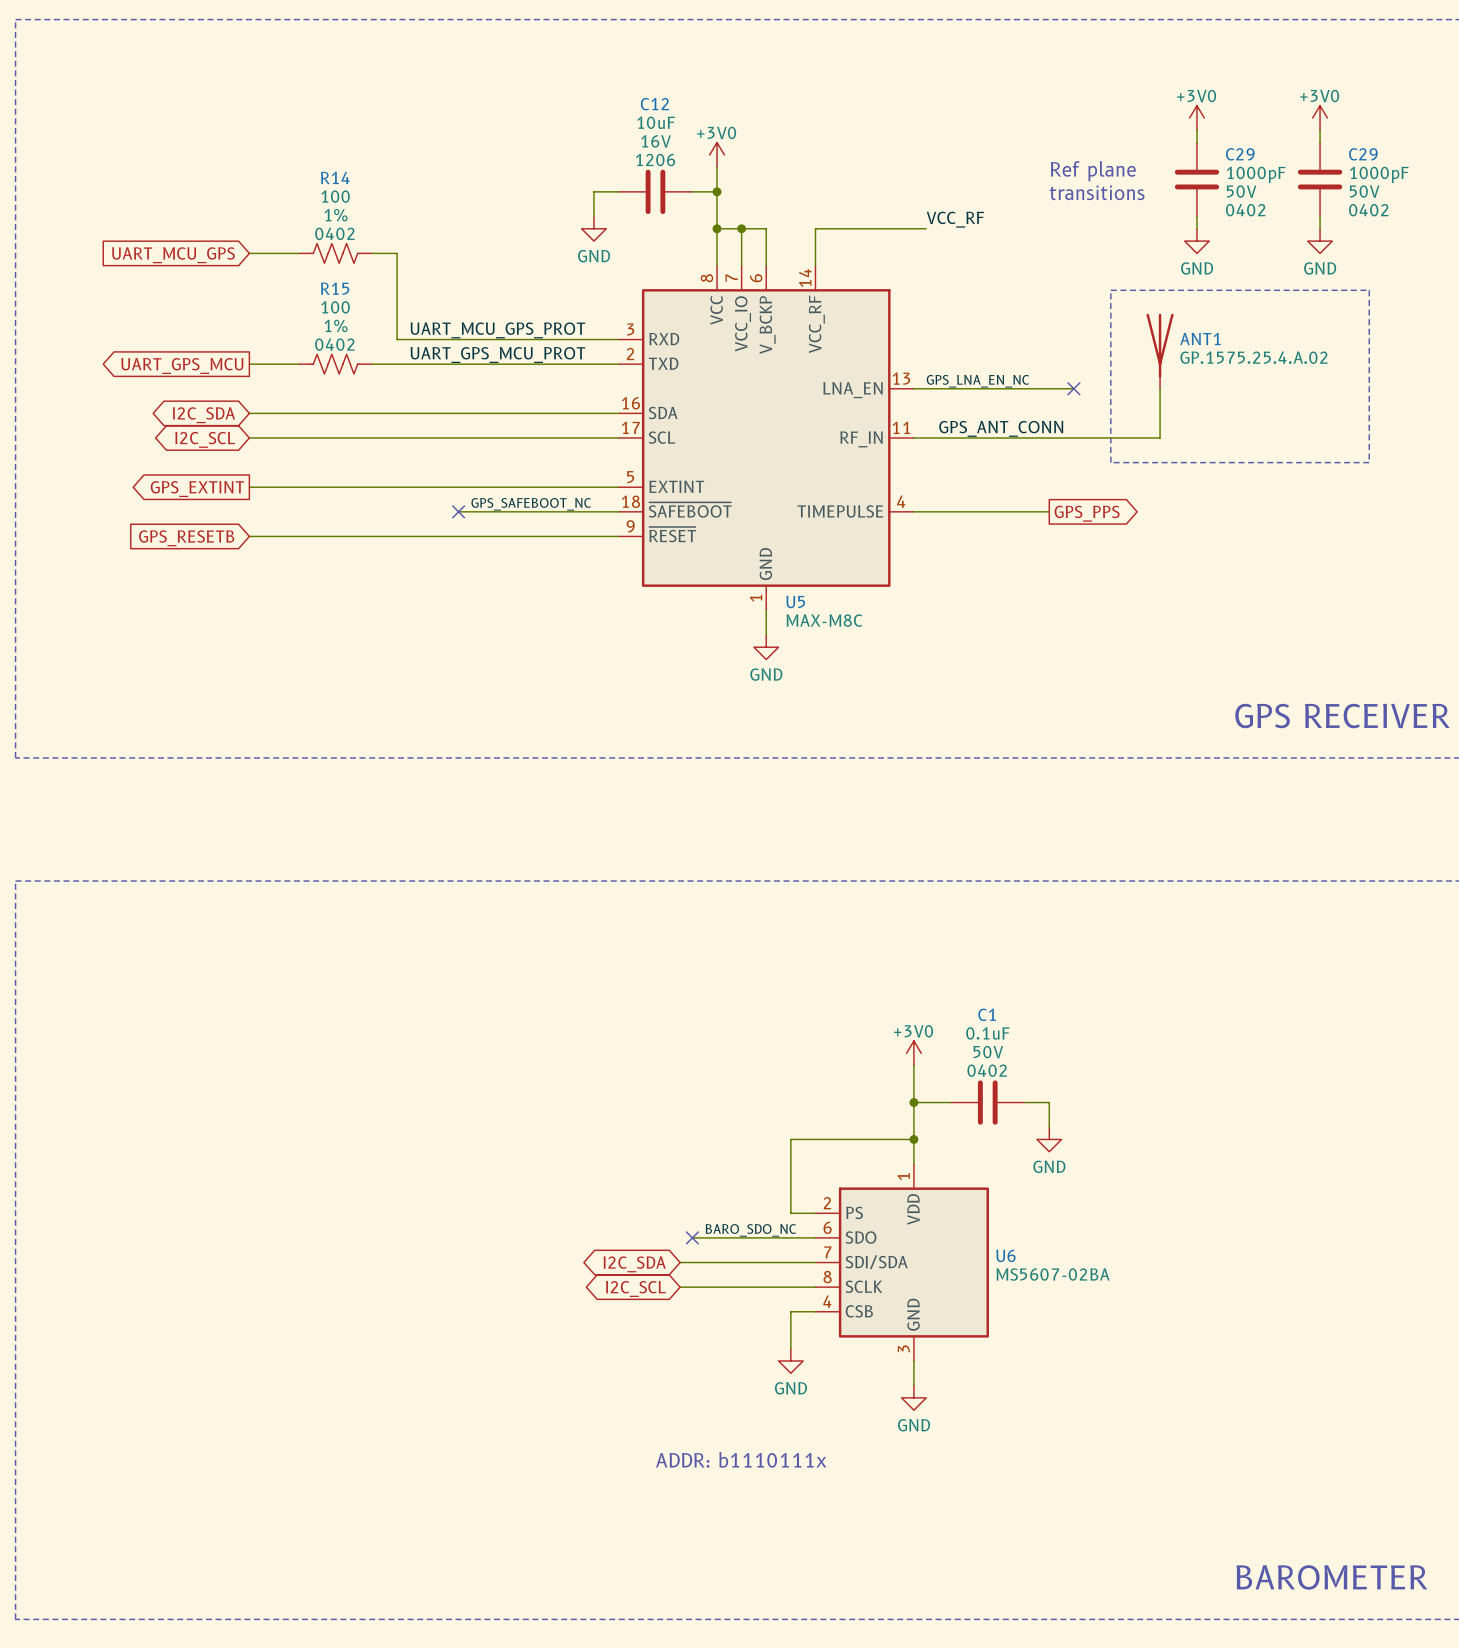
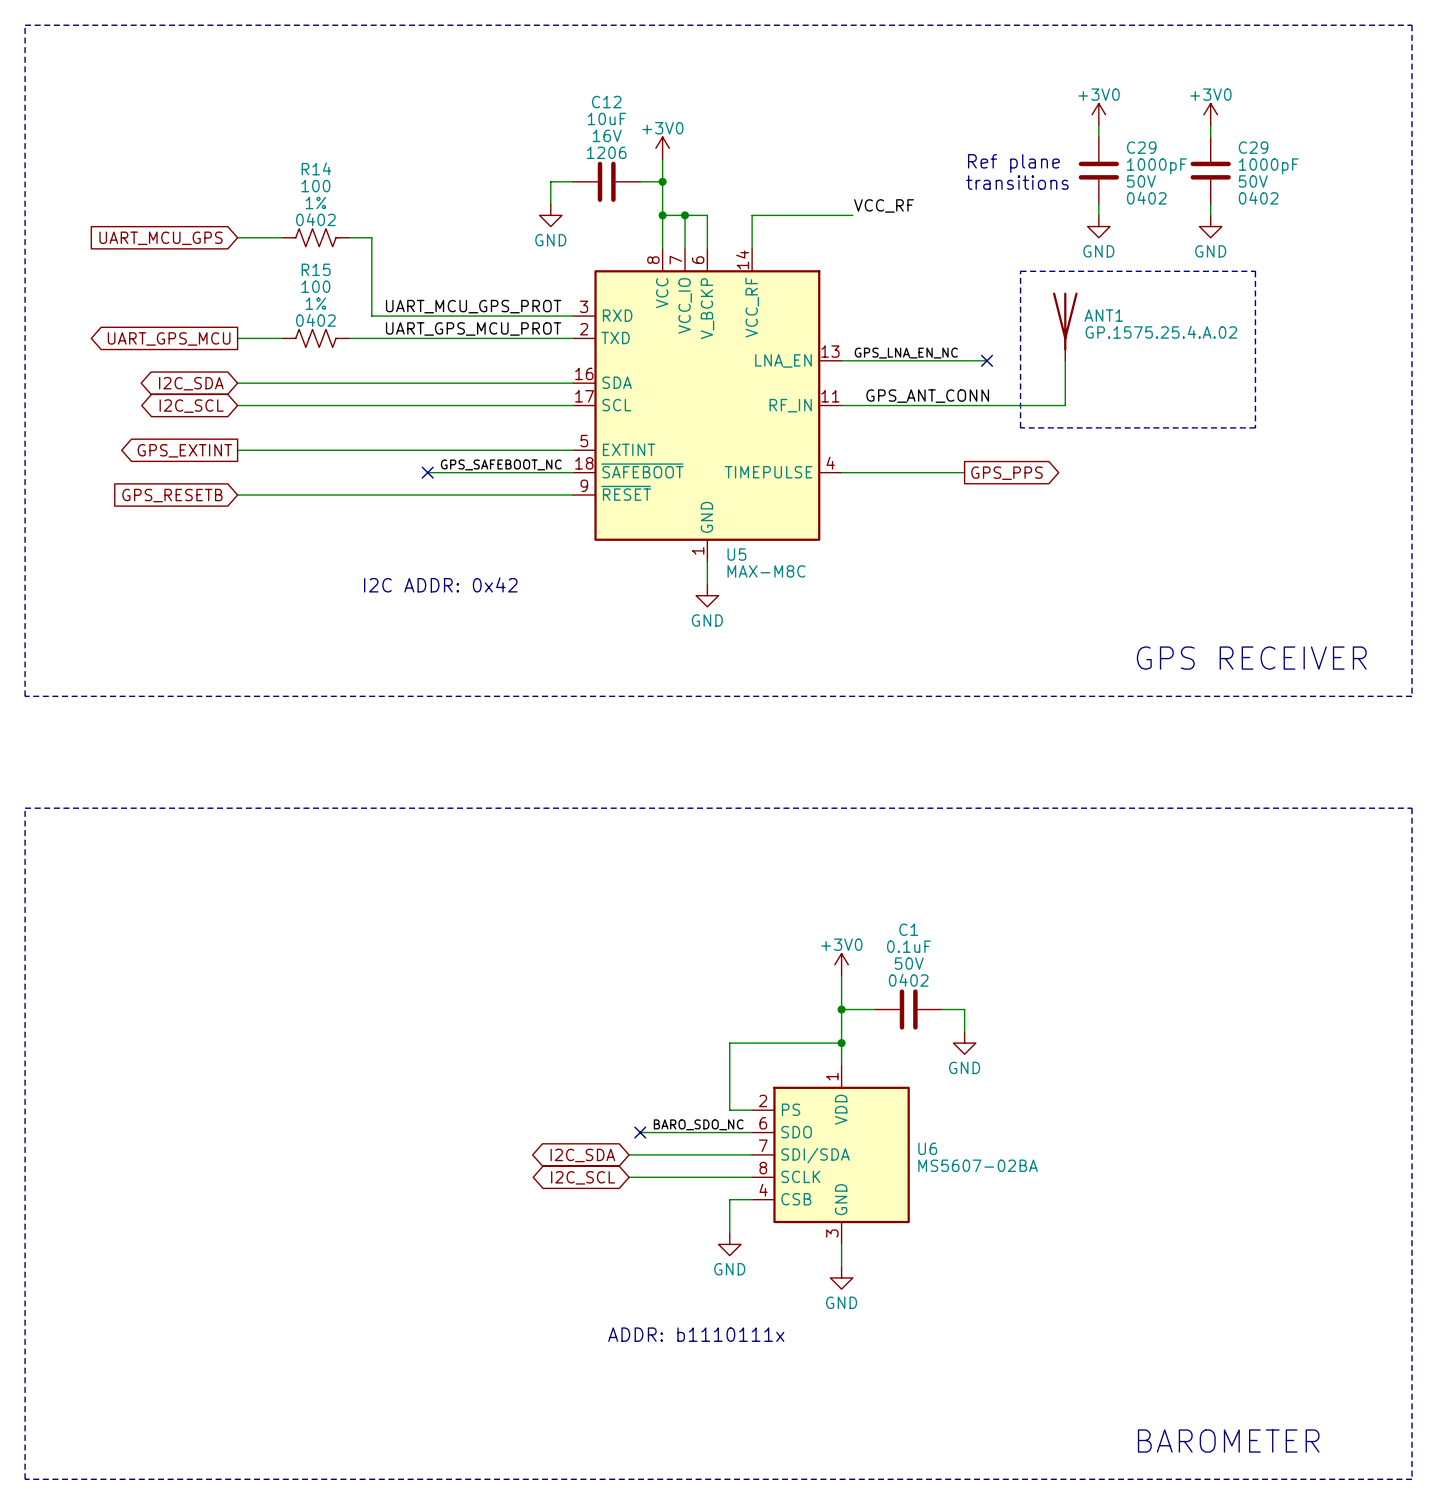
text: none -> I2C ADDR: 0x42 (440, 584)

